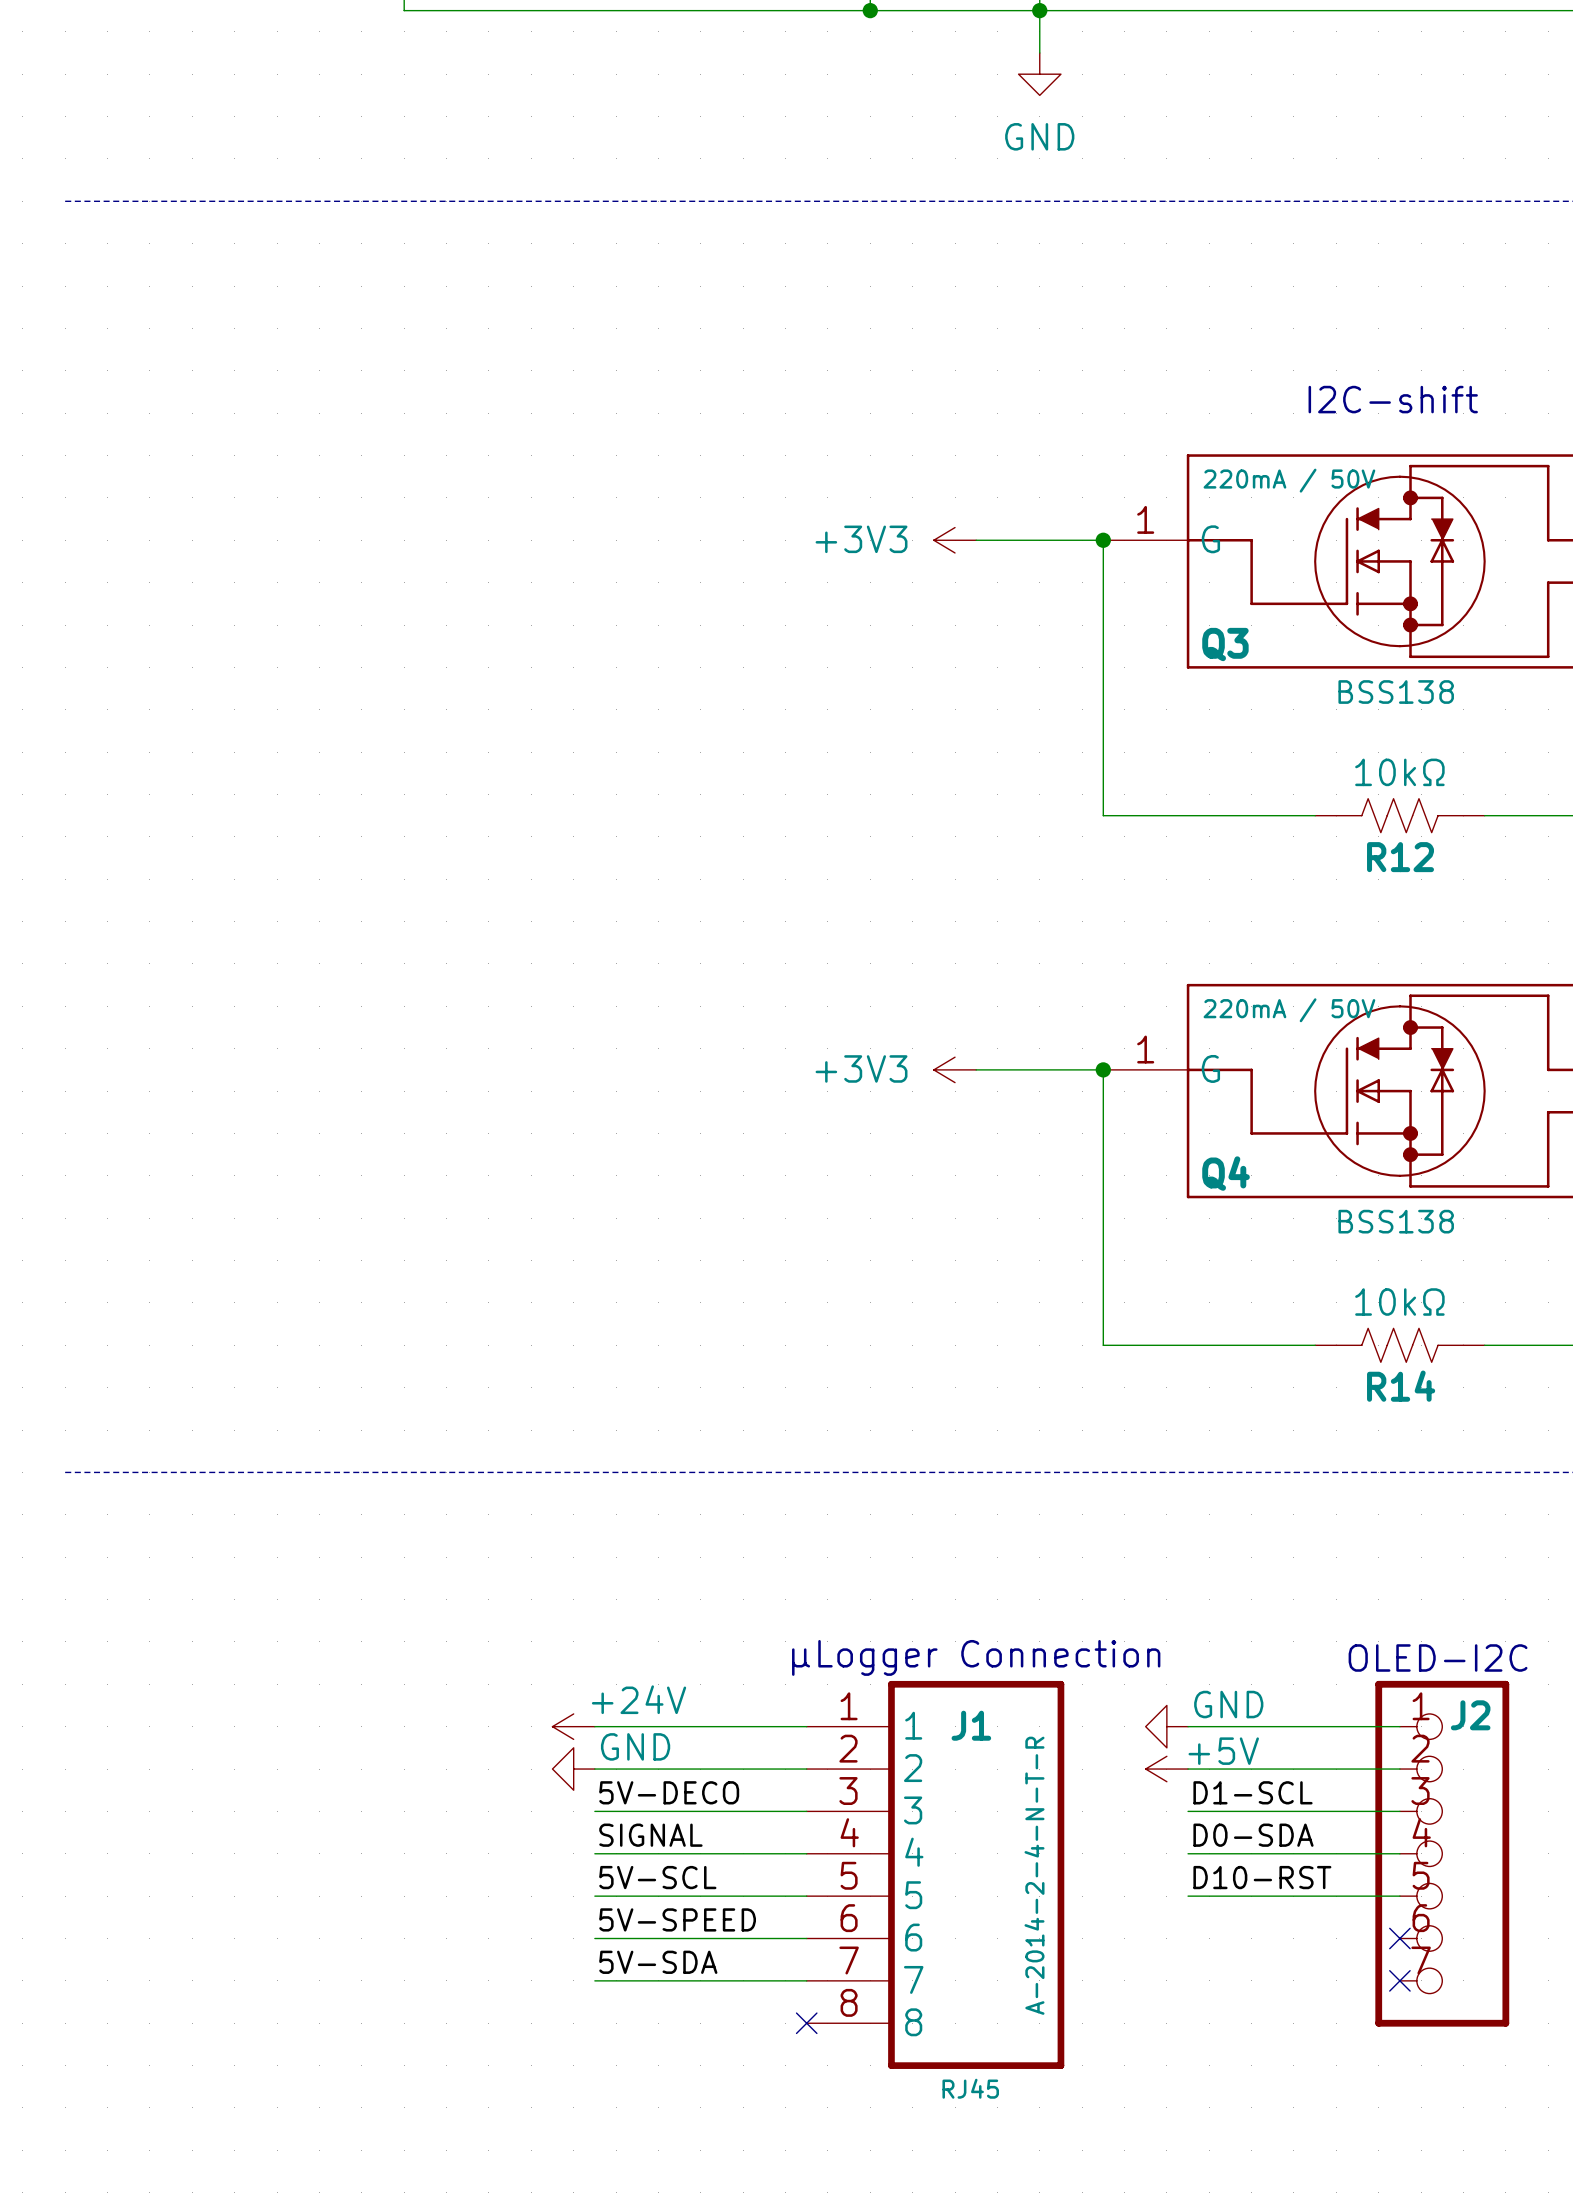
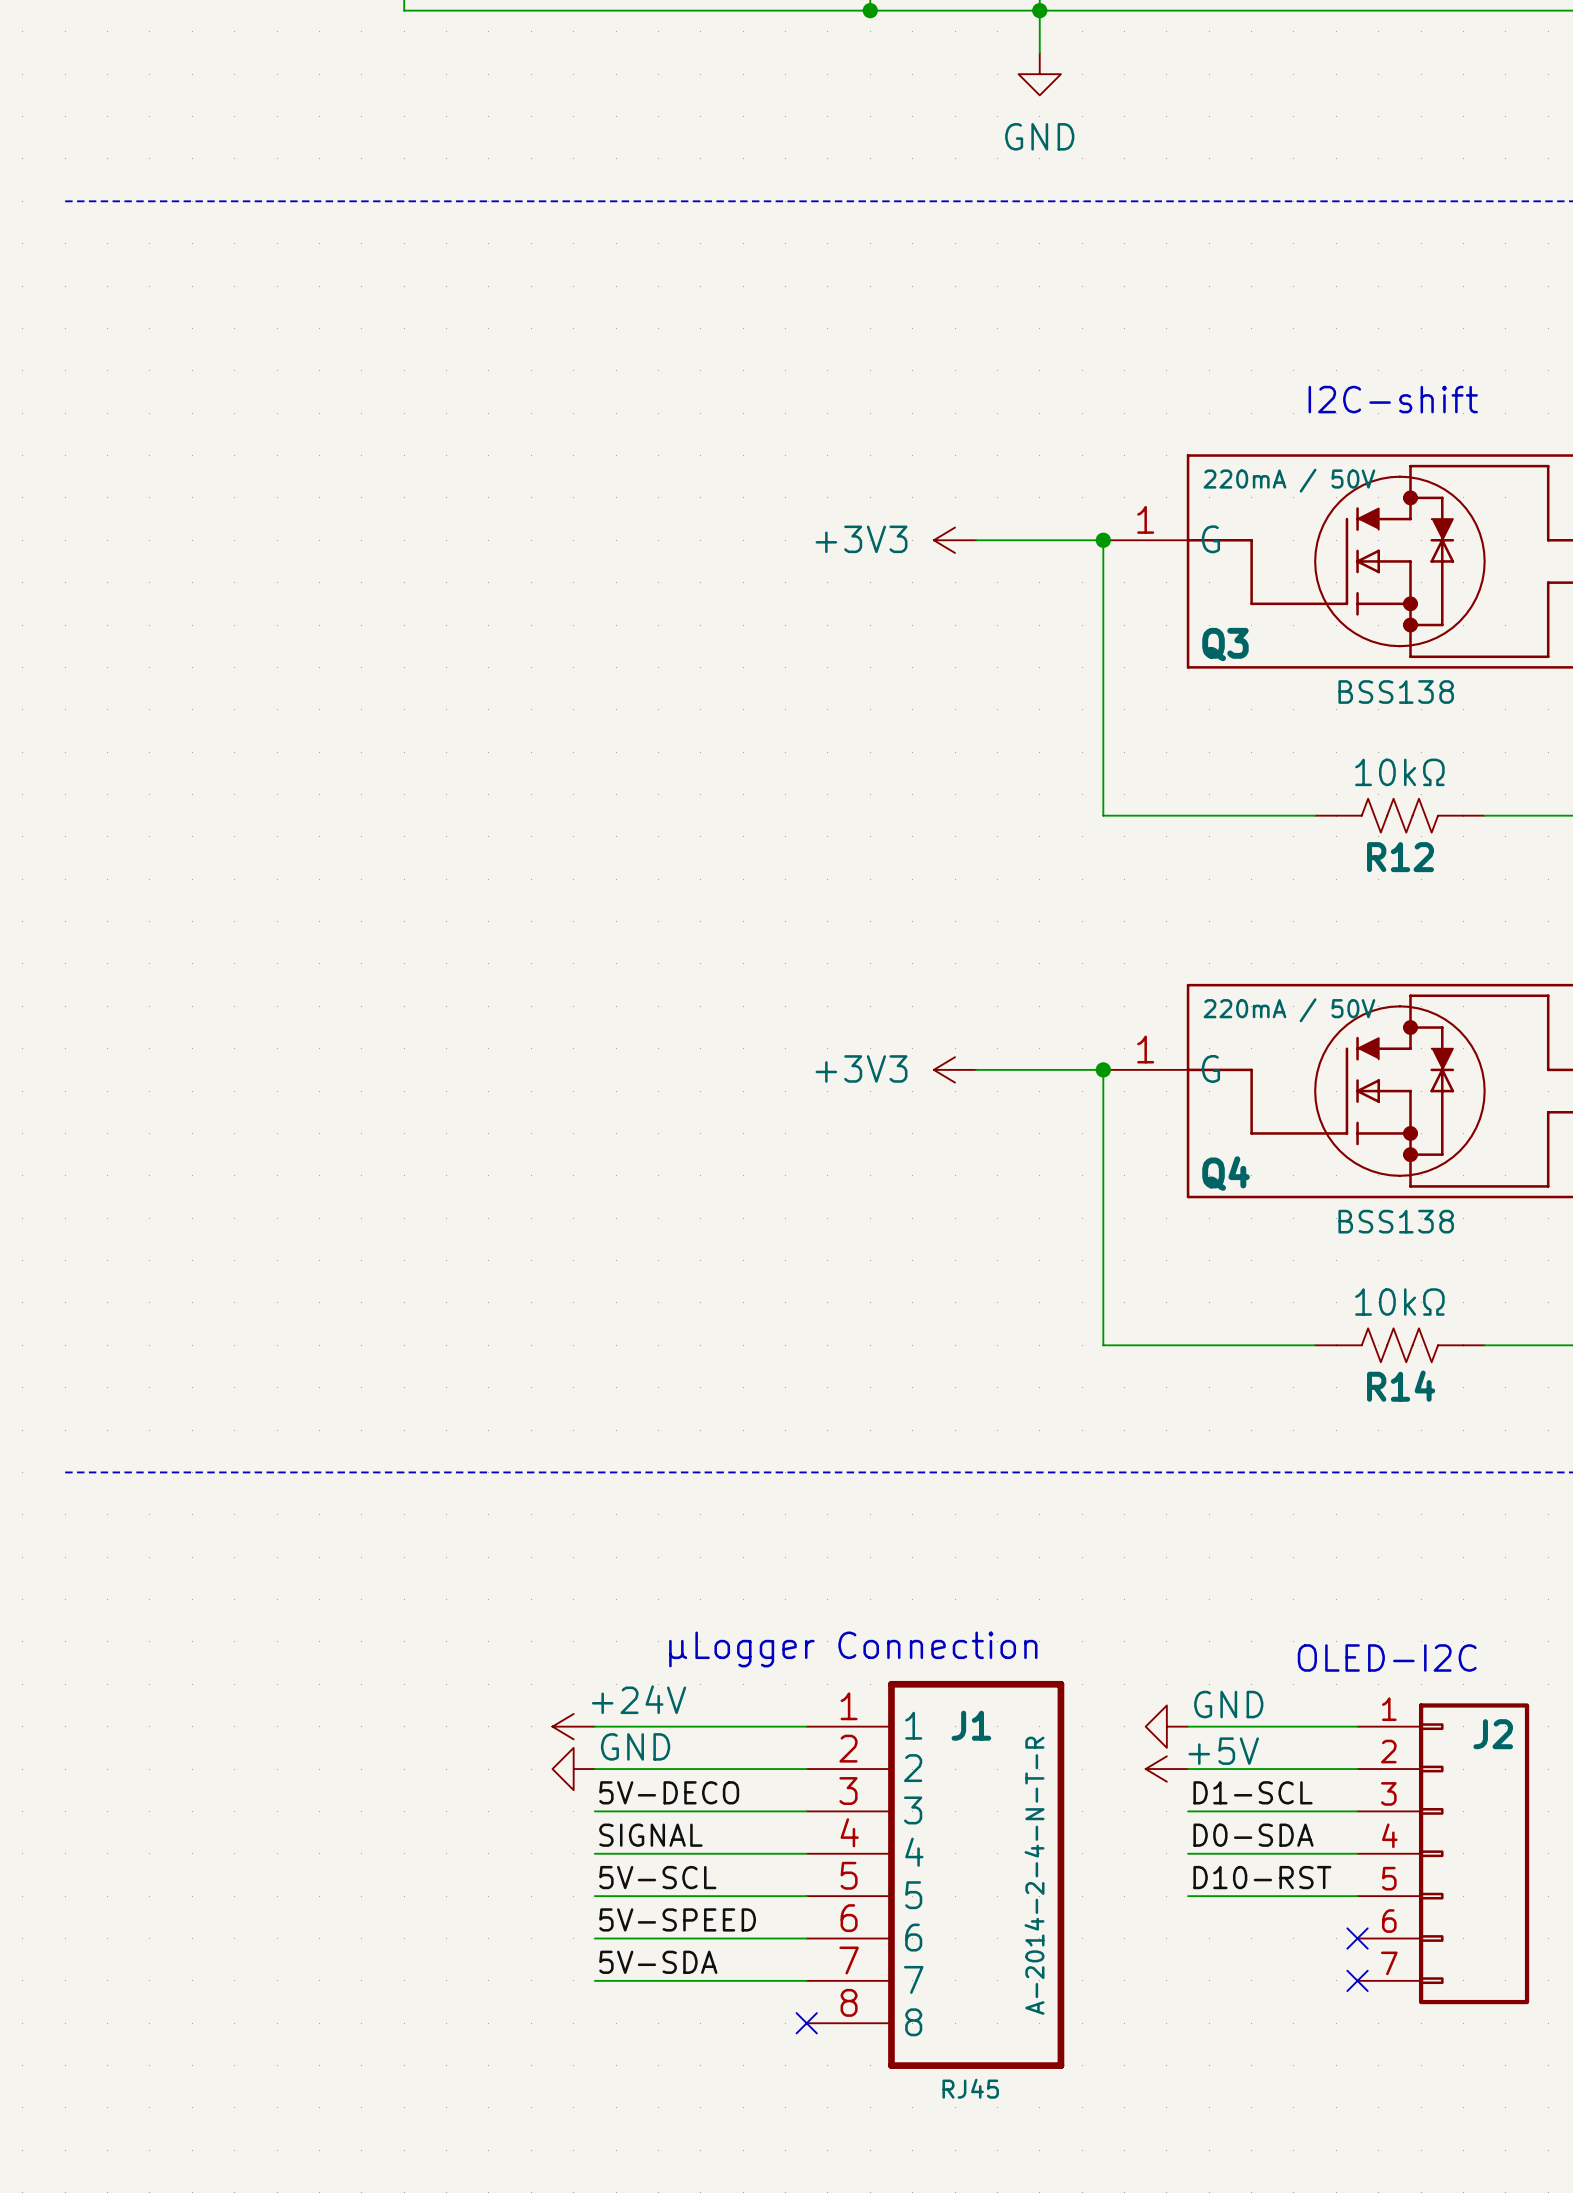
text position: µLogger Connection (976, 1657) -> µLogger Connection (853, 1649)
text position: OLED-I2C (1438, 1657) -> OLED-I2C (1387, 1657)
J2 symbol: [1375, 1680, 1510, 2027] -> [1357, 1703, 1530, 2005]
no-connect mark: none -> (1357, 1938)
no-connect mark: (1399, 1938) -> none
no-connect mark: none -> (1357, 1980)
no-connect mark: (1399, 1980) -> none

